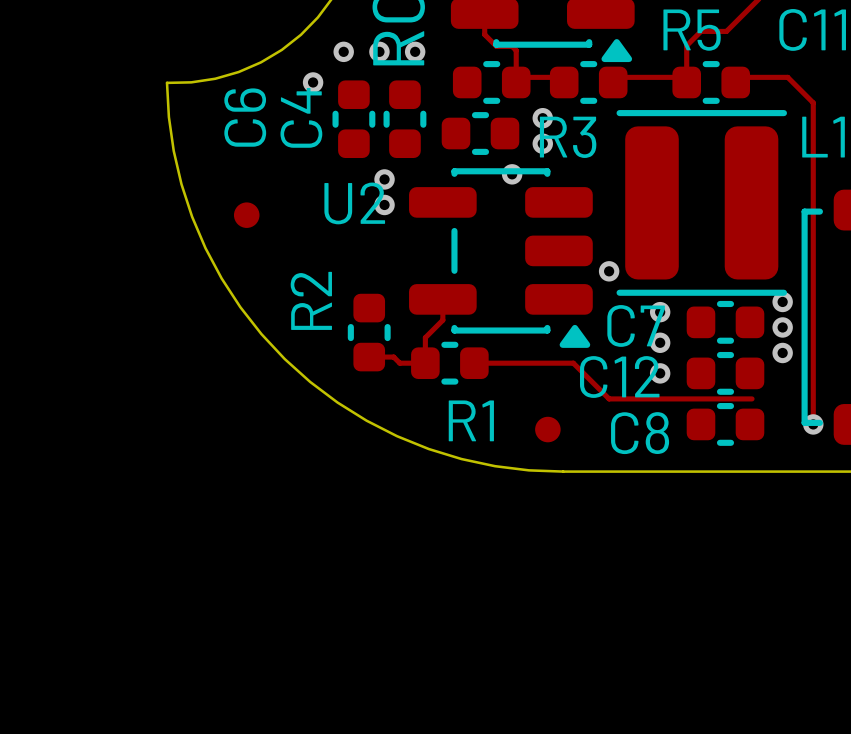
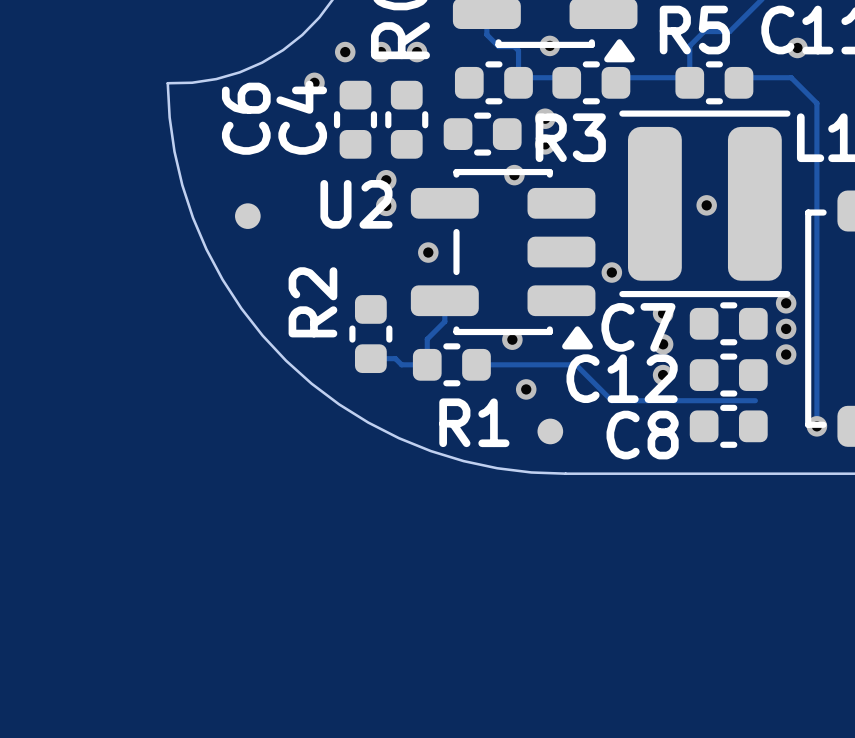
via: none -> (549, 45)
via: none -> (797, 47)
via: none -> (706, 205)
via: none -> (428, 252)
via: none -> (512, 339)
via: none -> (526, 389)

